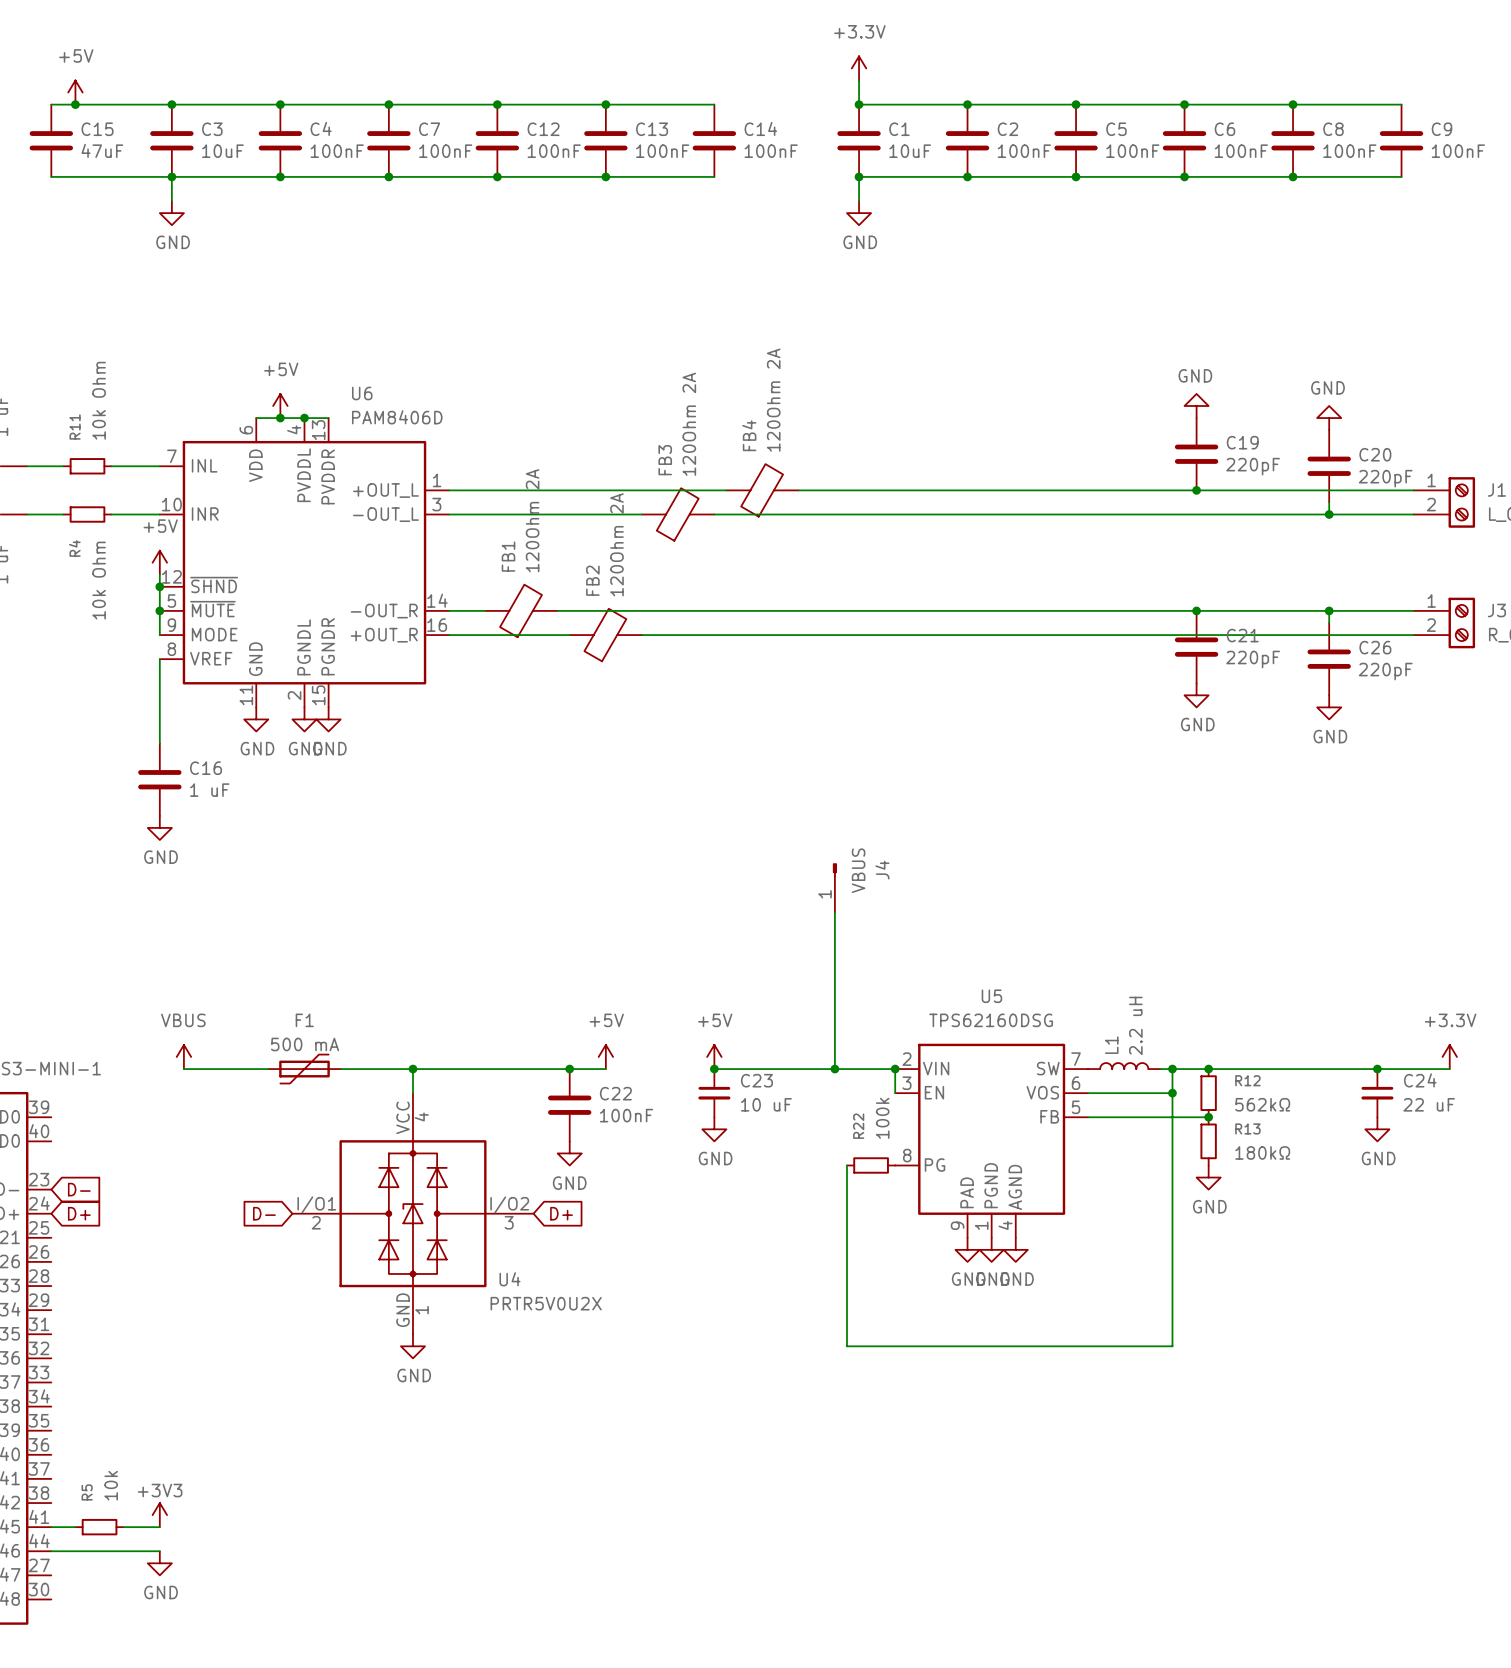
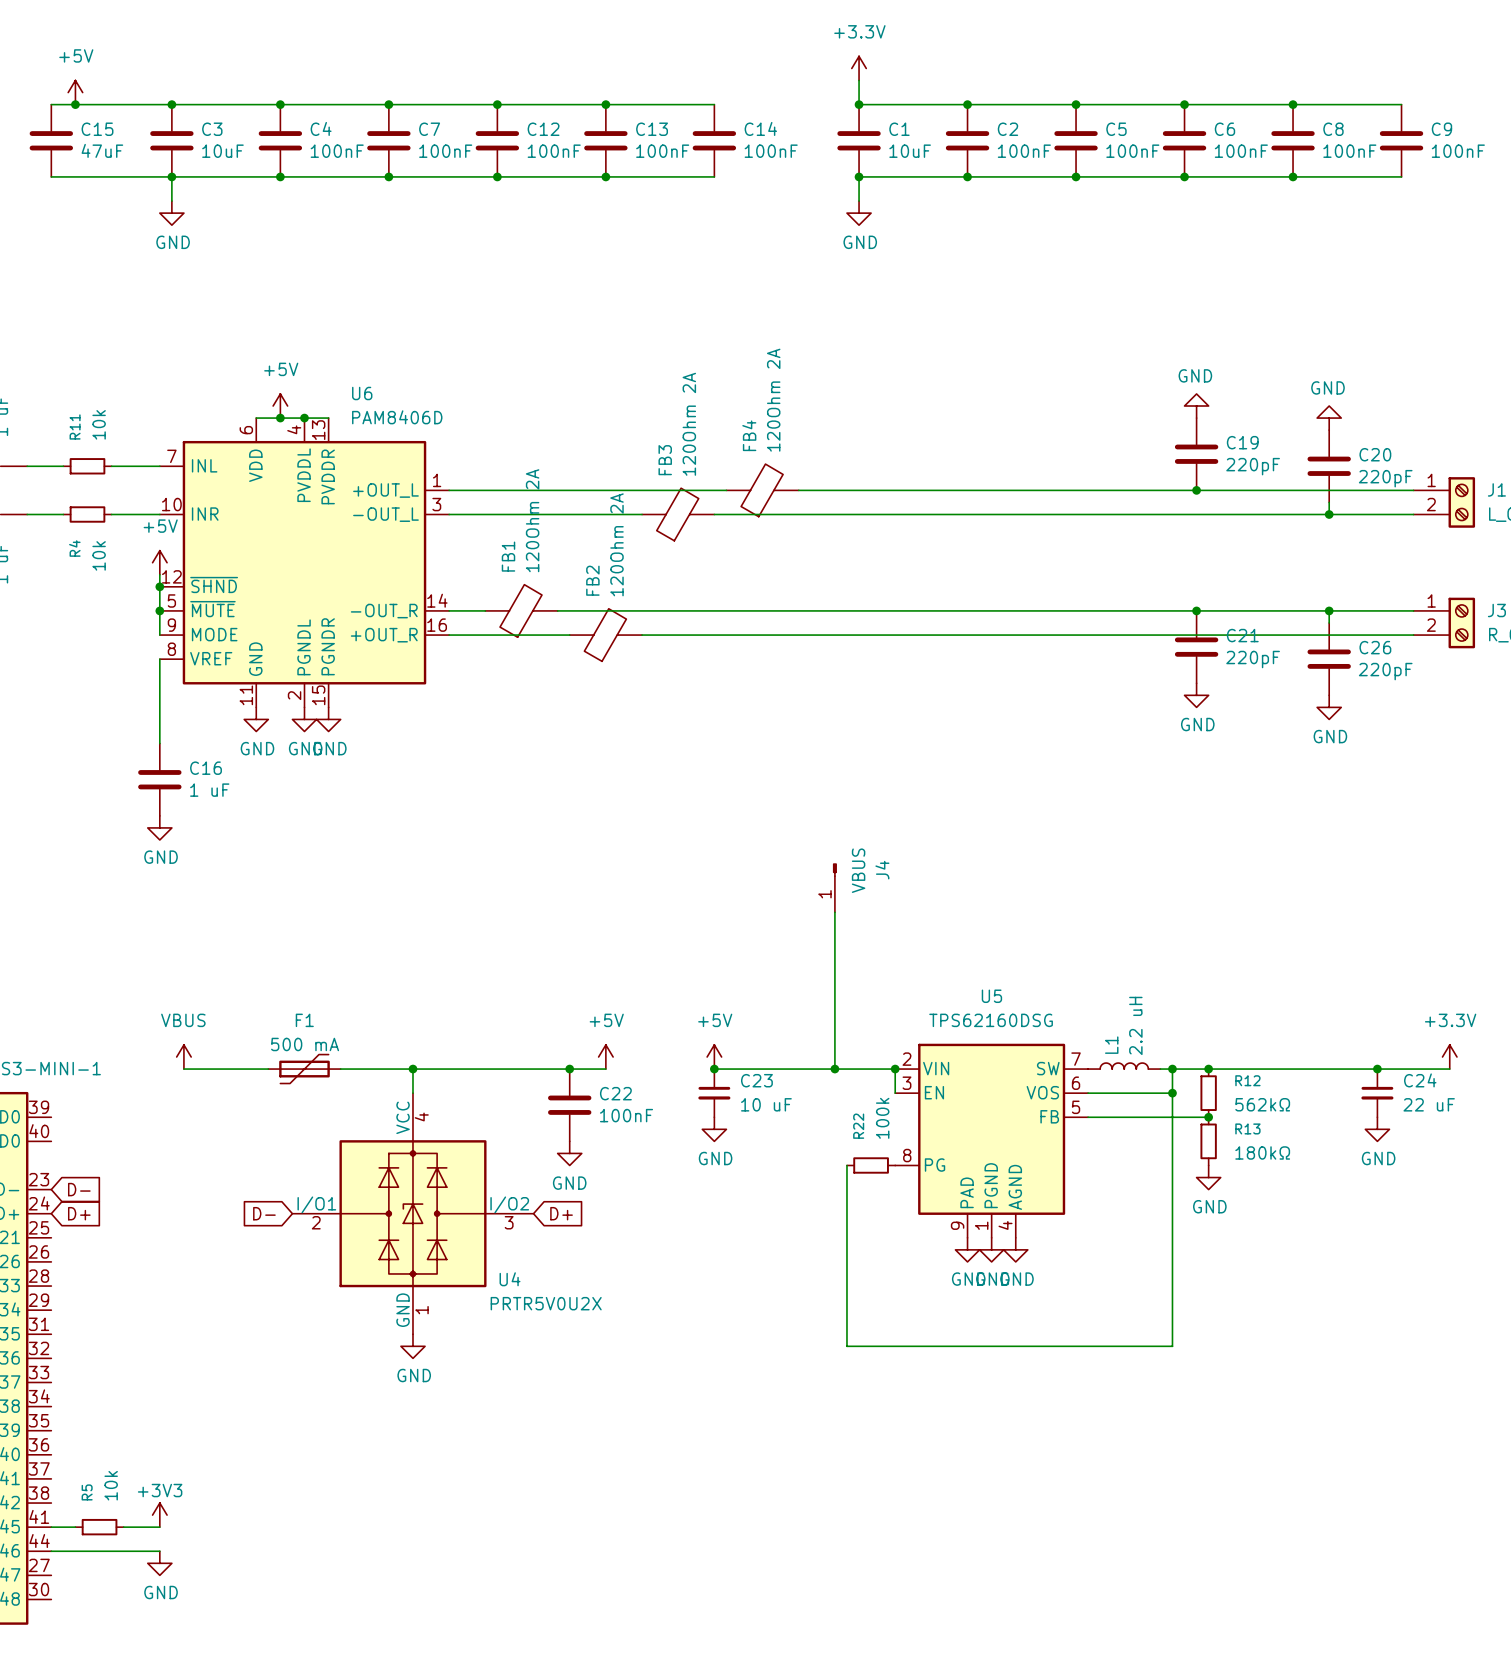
R11 value: 10k Ohm (99, 400) -> 10k (99, 424)
R4 value: 10k Ohm (99, 580) -> 10k (99, 555)

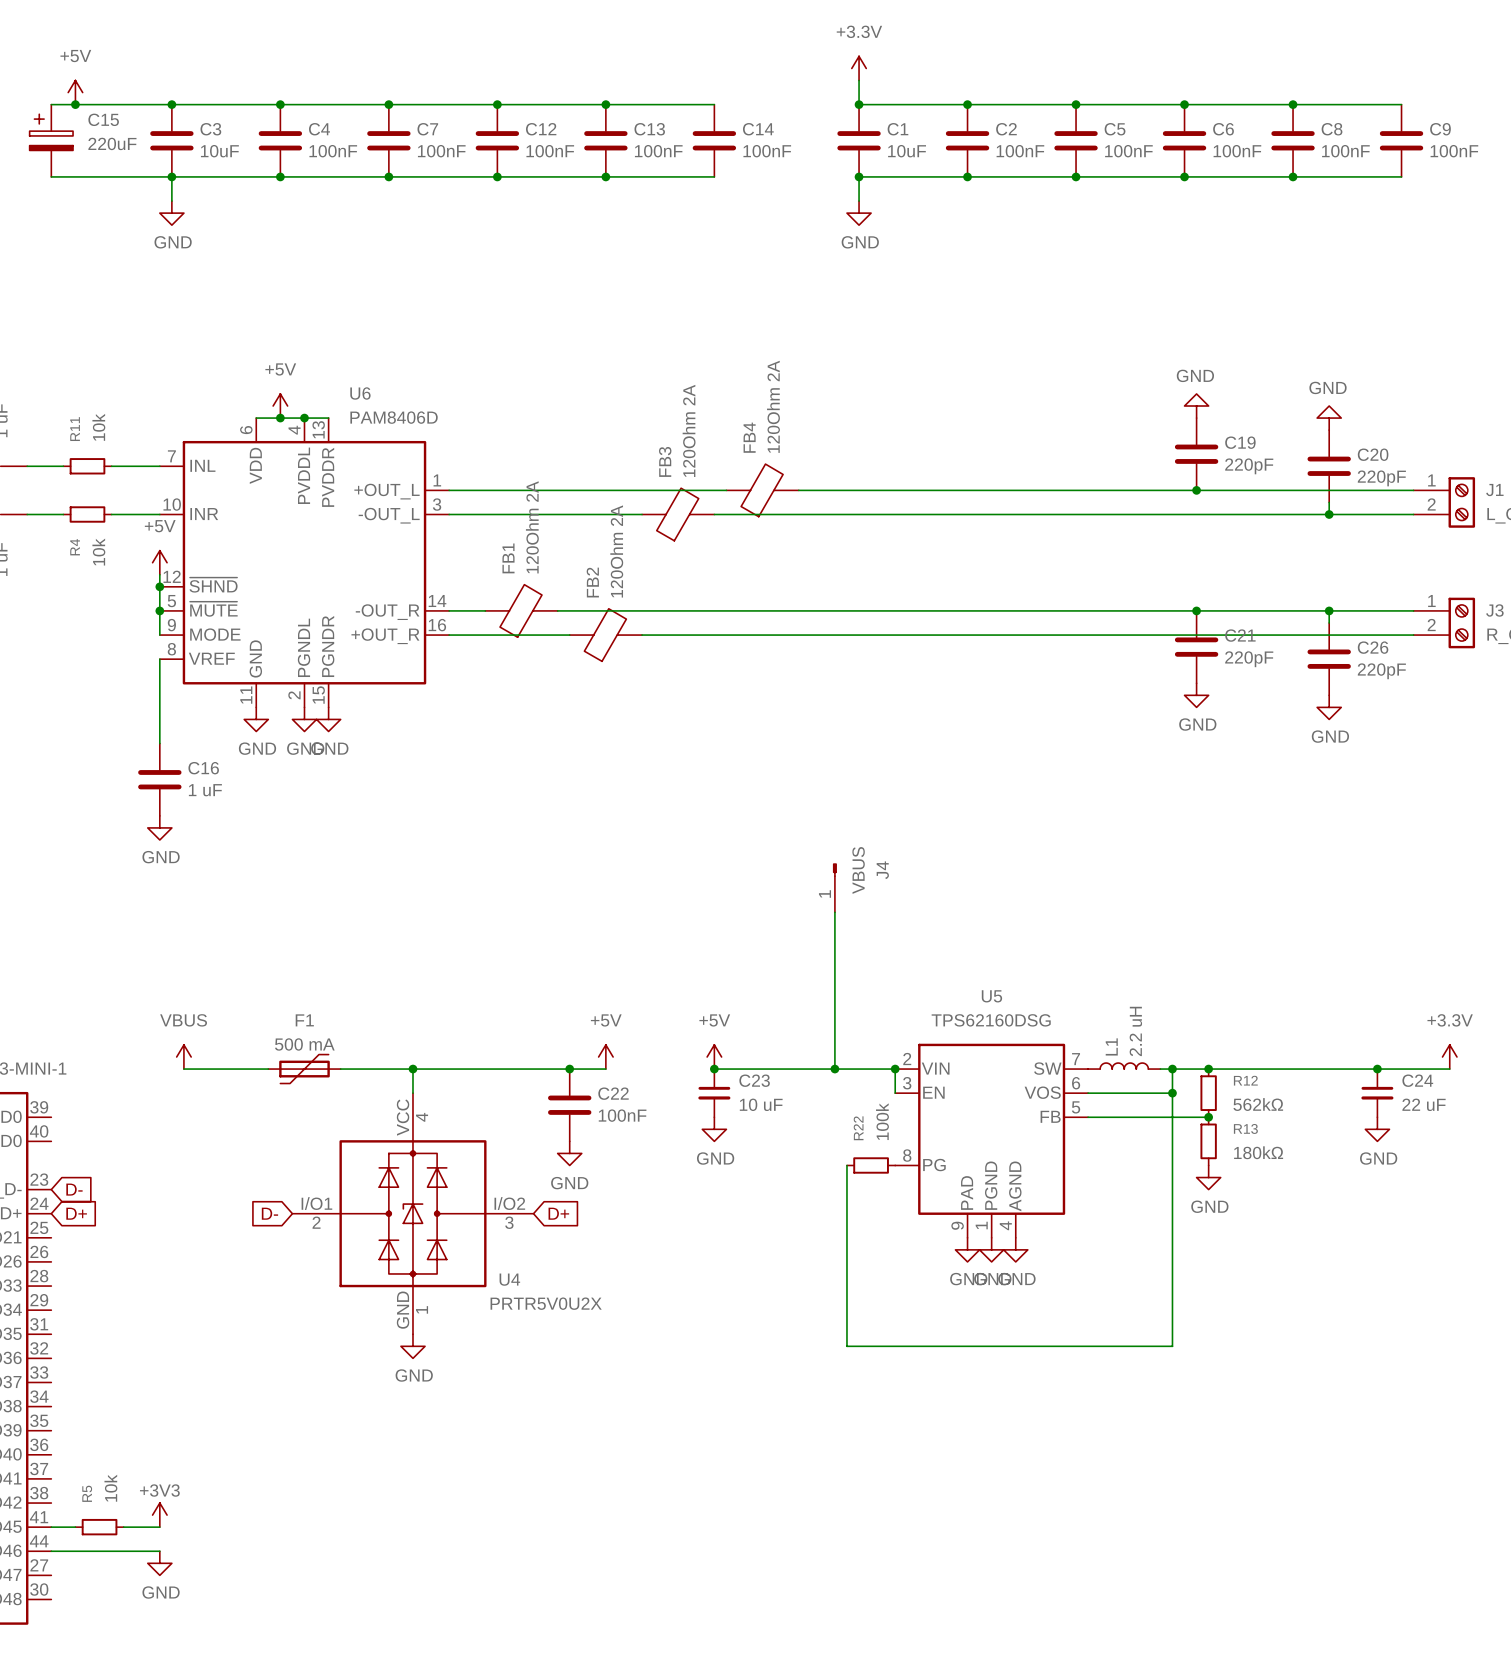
C15 symbol: [29, 104, 74, 177] -> [29, 104, 74, 177]
C15 value: 47uF (102, 150) -> 220uF (112, 143)

